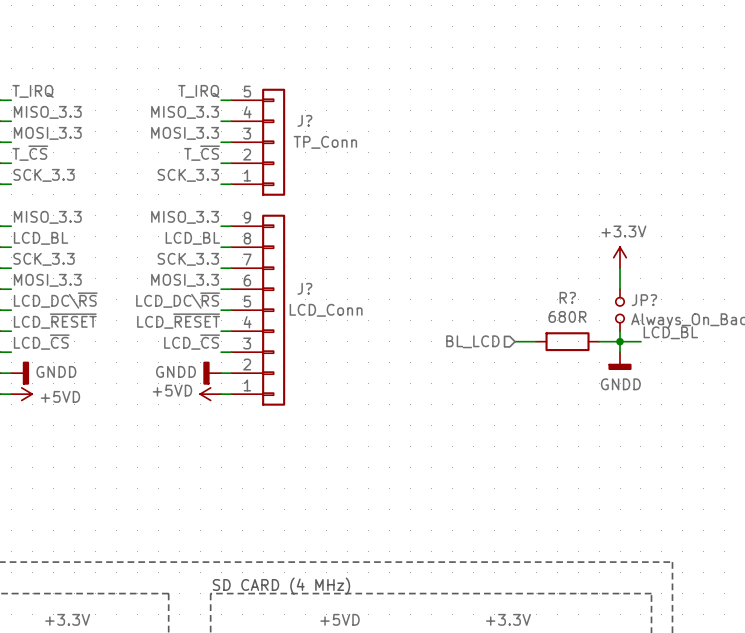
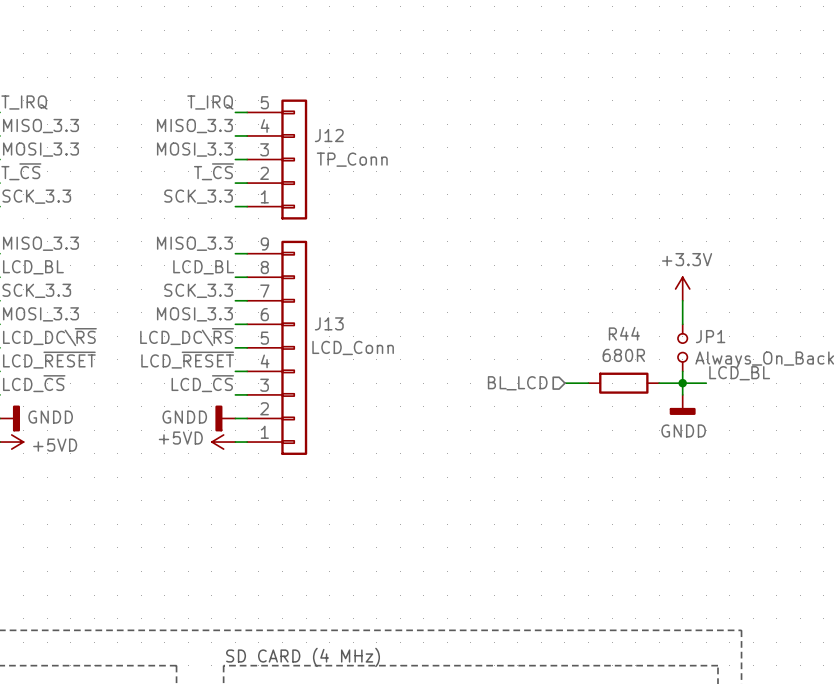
J? name: J? (304, 120) -> J12 (329, 135)
J? name: J? (304, 288) -> J13 (329, 323)
R? name: R? (567, 297) -> R44 (624, 333)
JP? name: JP? (644, 300) -> JP1 (710, 336)

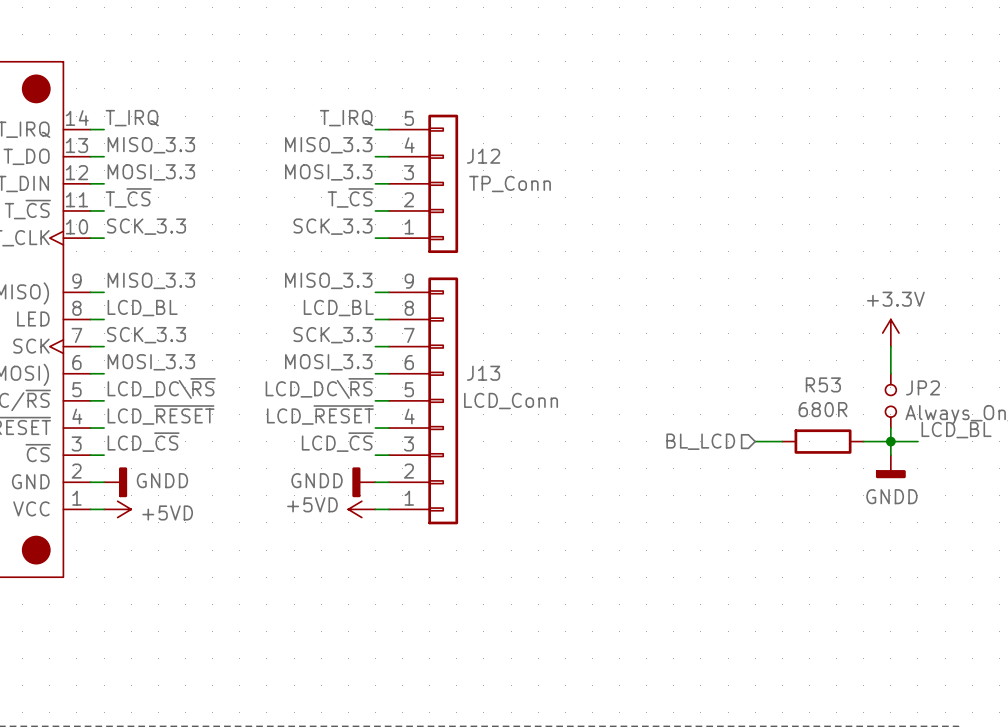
R44 name: R44 (624, 333) -> R53 (823, 384)
JP1 name: JP1 (710, 336) -> JP2 (923, 387)

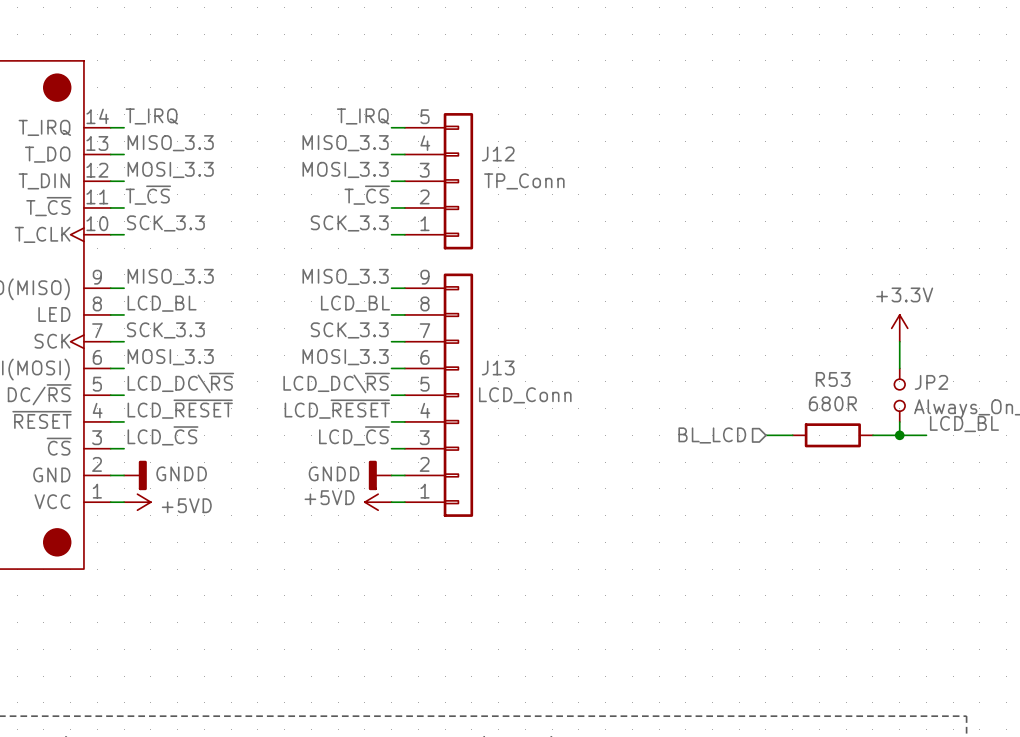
wire: (890, 441) (890, 455) -> none
power symbol: GNDD (890, 466) -> none

